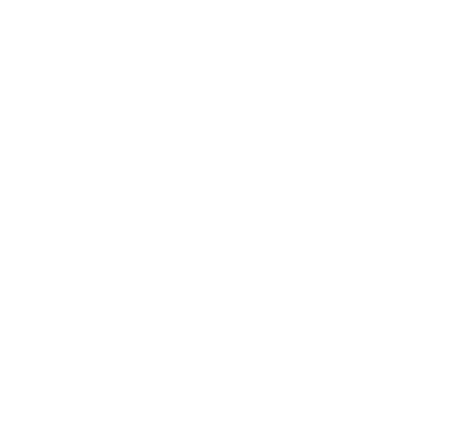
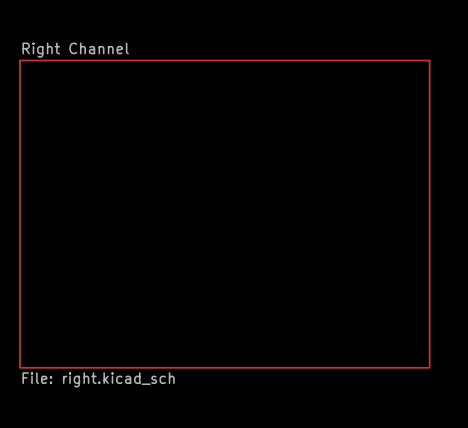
sheet Right Channel: none -> File: right.kicad_sch (224, 214)

